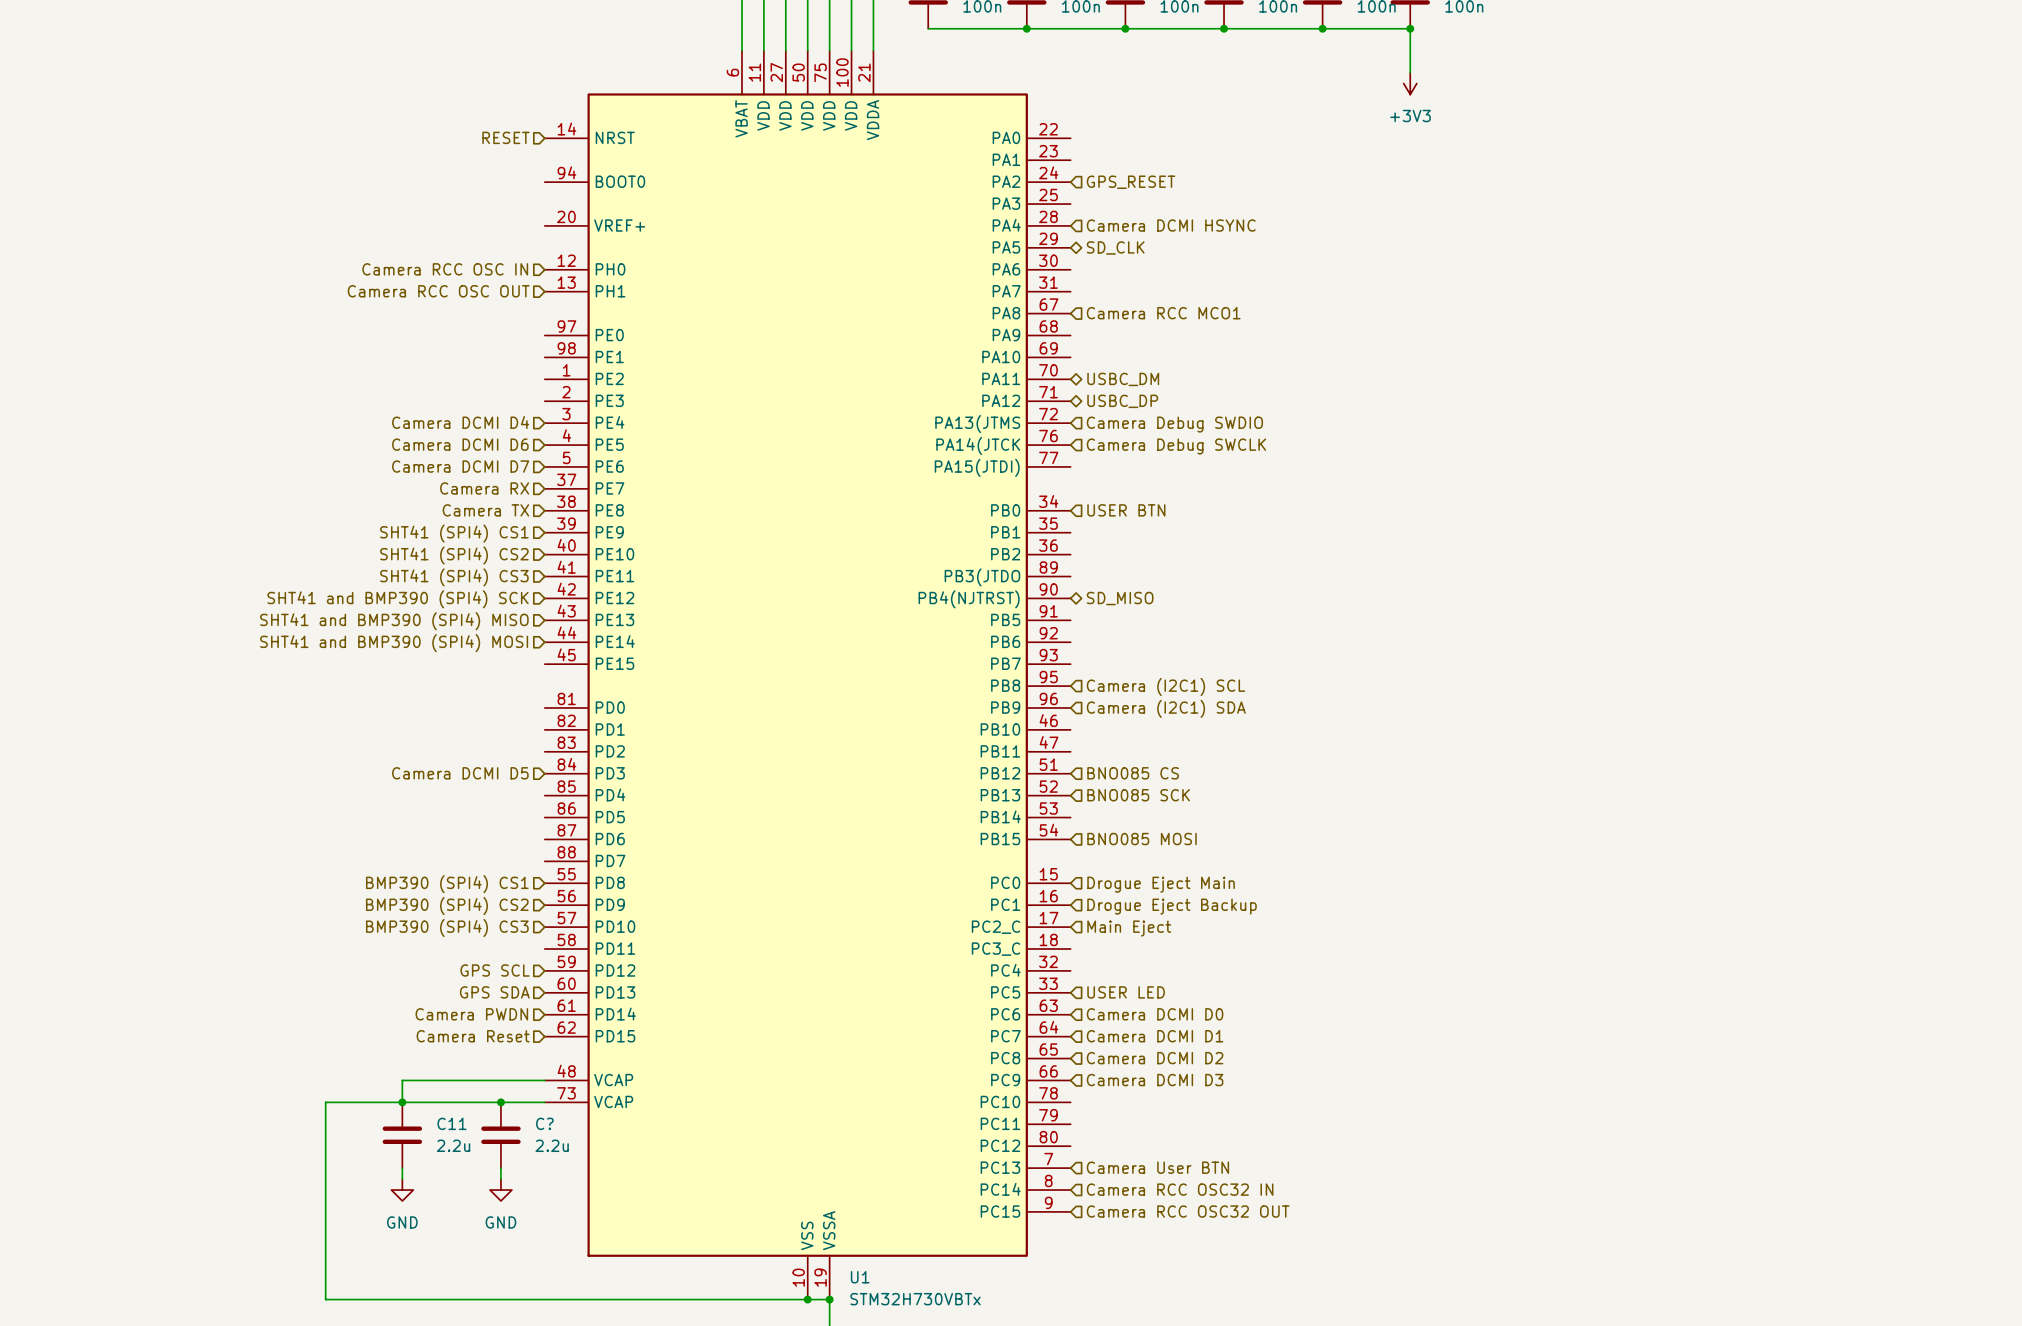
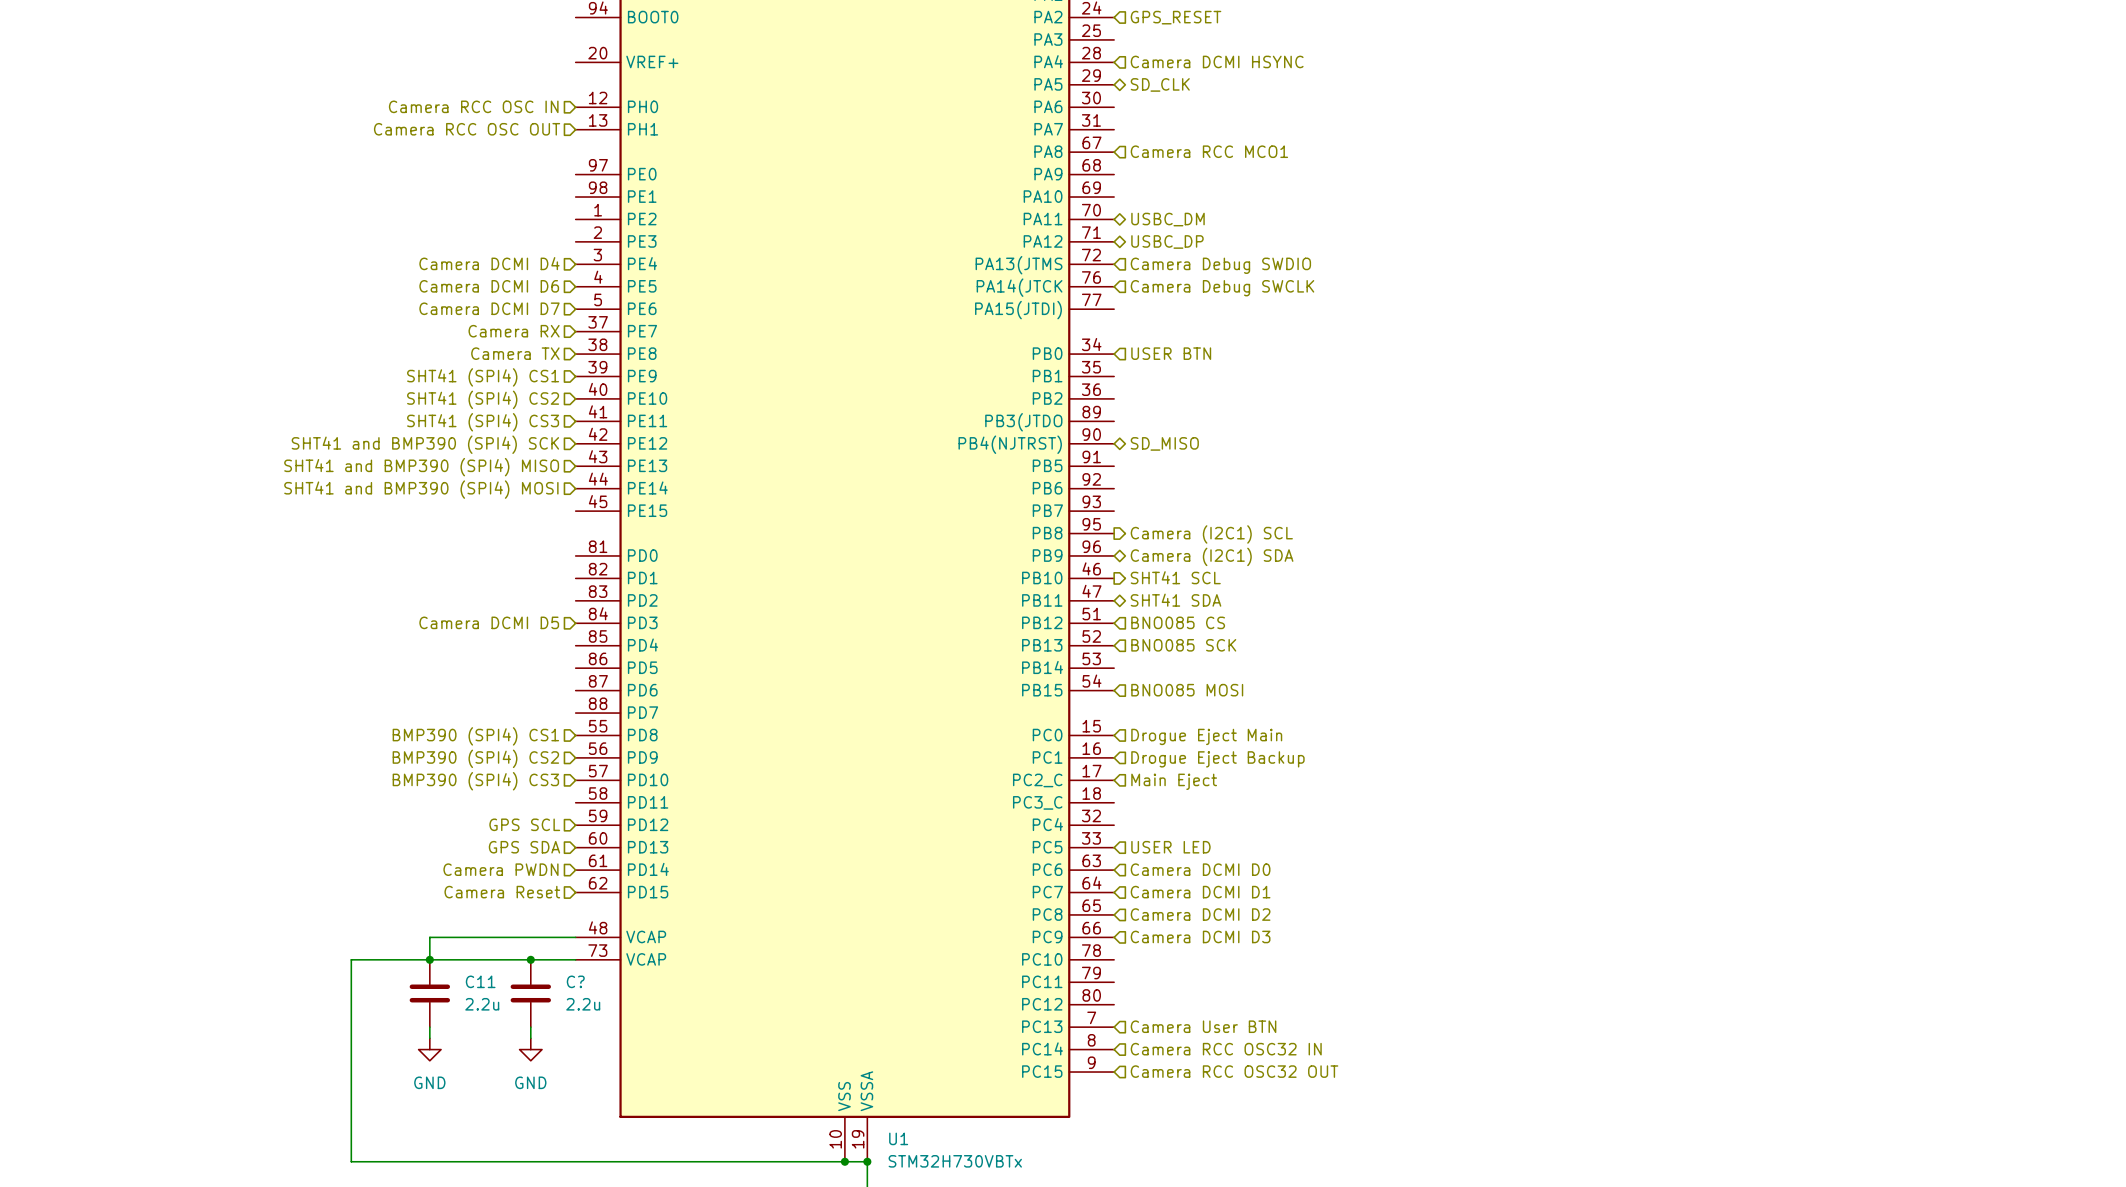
hierarchical label shape: input (1166, 686) -> output (1211, 534)
hierarchical label shape: input (1166, 708) -> bidirectional (1212, 556)
hierarchical label: none -> SHT41 SCL (1175, 577)
hierarchical label: none -> SHT41 SDA (1176, 600)

